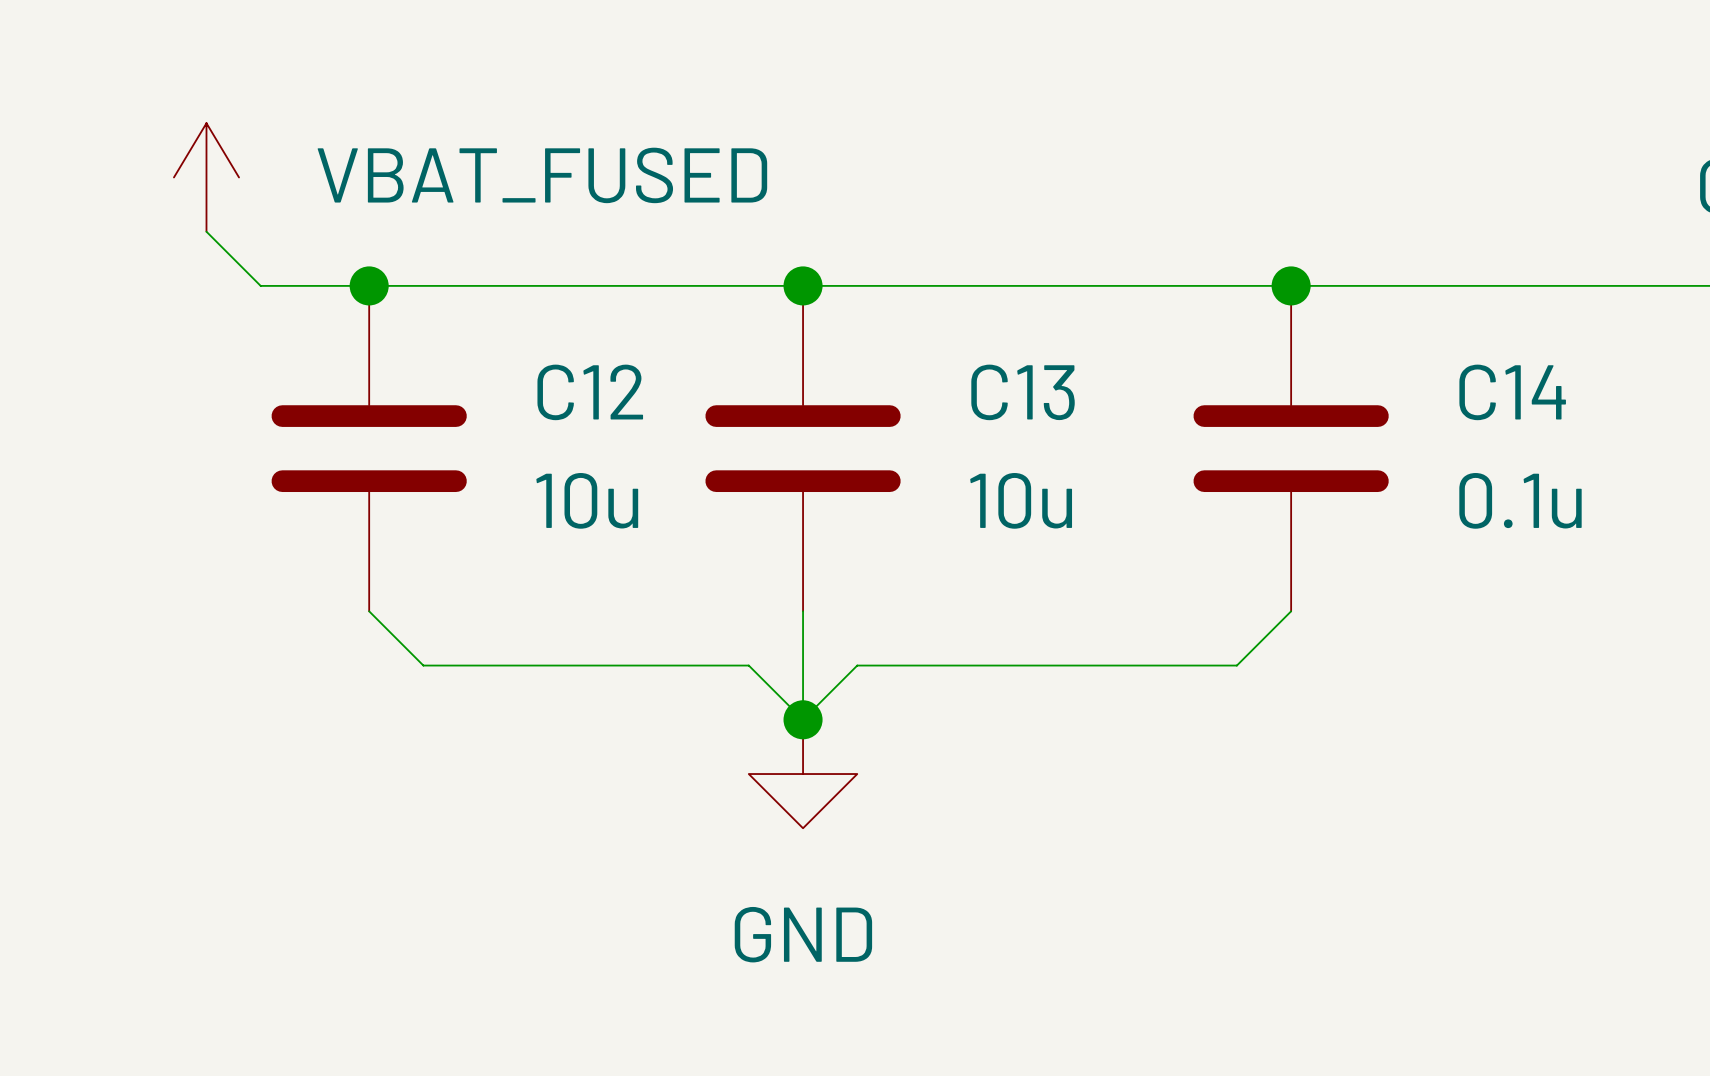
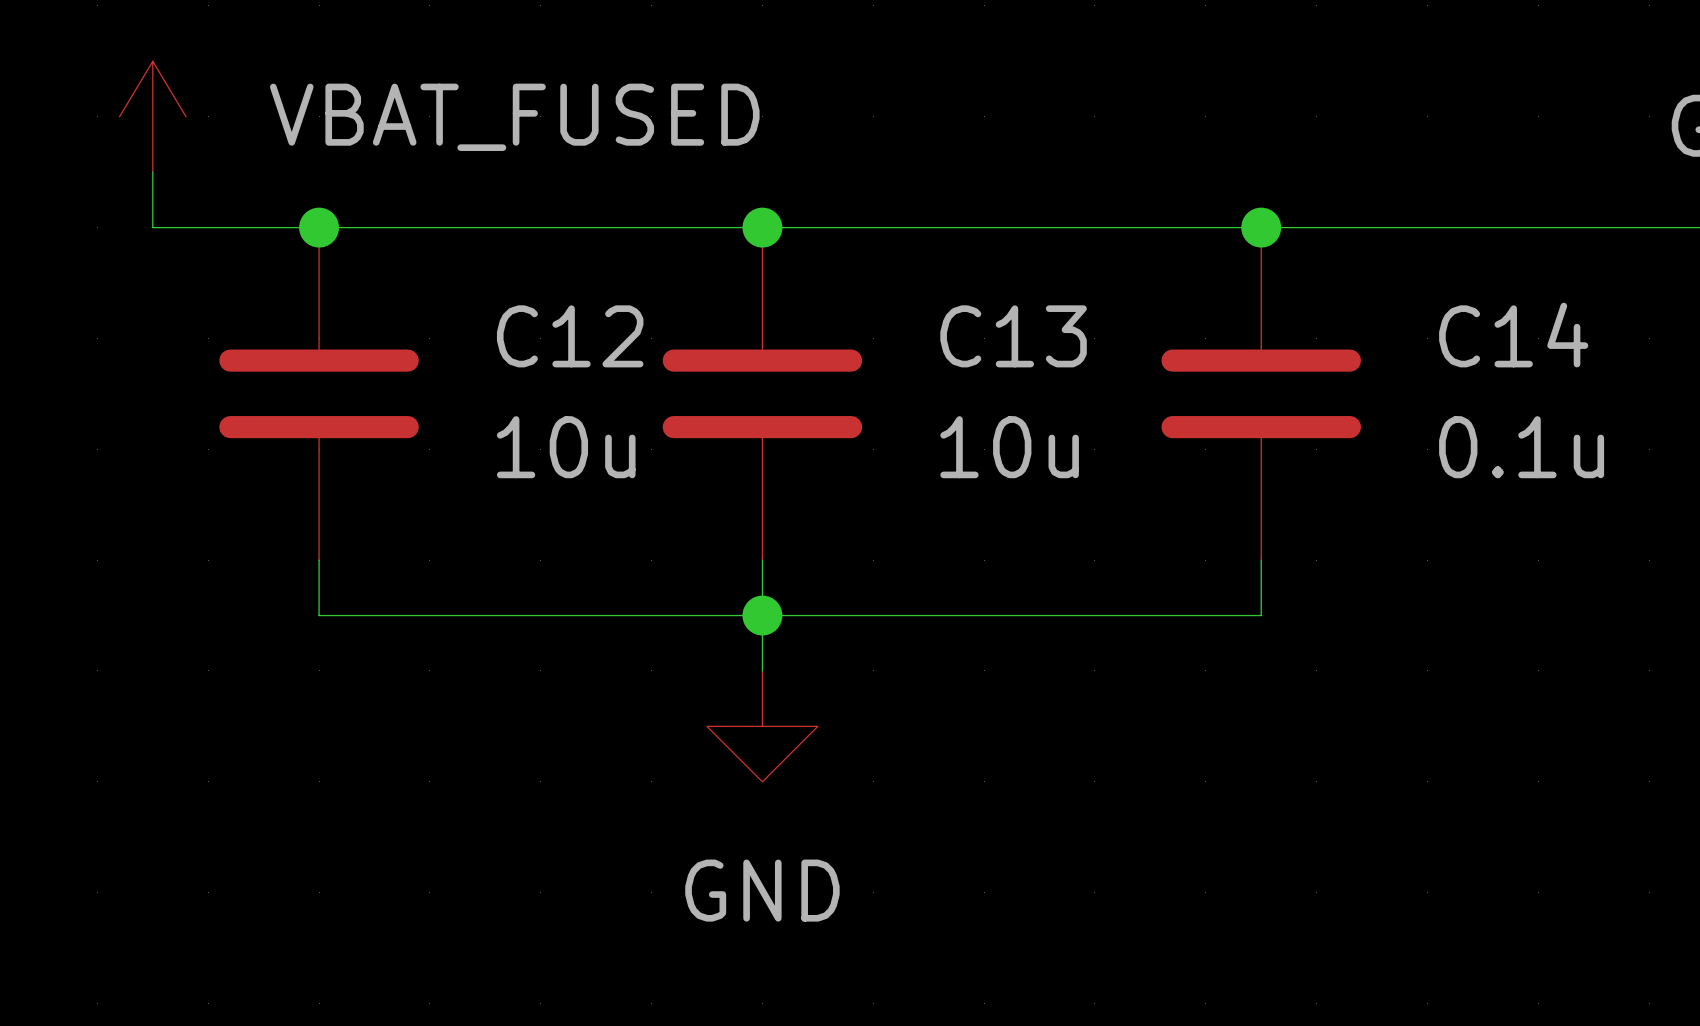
wire: (206, 231) (260, 285) -> (152, 172) (152, 227) (208, 227)
wire: (369, 611) (423, 665) -> (319, 560) (319, 615) (374, 615)
wire: (1291, 611) (1236, 665) -> (1261, 560) (1261, 615) (1205, 615)
wire: (748, 665) (803, 719) (857, 665) -> (707, 615) (817, 615)
junction position: (803, 719) -> (762, 615)

